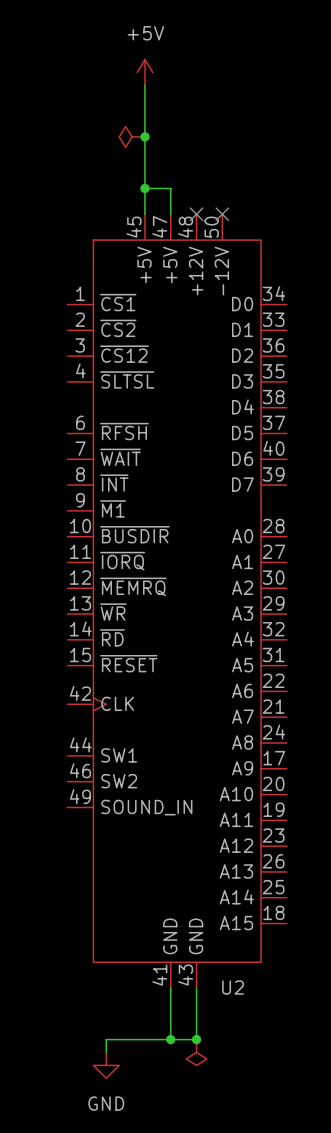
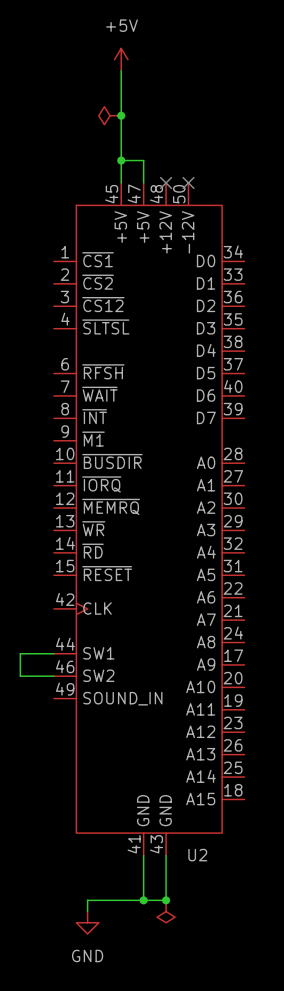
wire: none -> (53, 653) (20, 653) (20, 676) (53, 676)

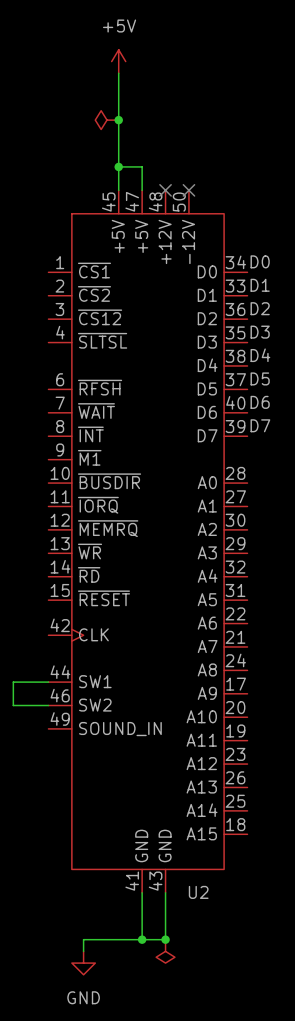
label: none -> D0 (260, 261)
label: none -> D1 (260, 285)
label: none -> D2 (260, 308)
label: none -> D3 (260, 332)
label: none -> D4 (260, 355)
label: none -> D5 (260, 378)
label: none -> D6 (260, 402)
label: none -> D7 (260, 425)

